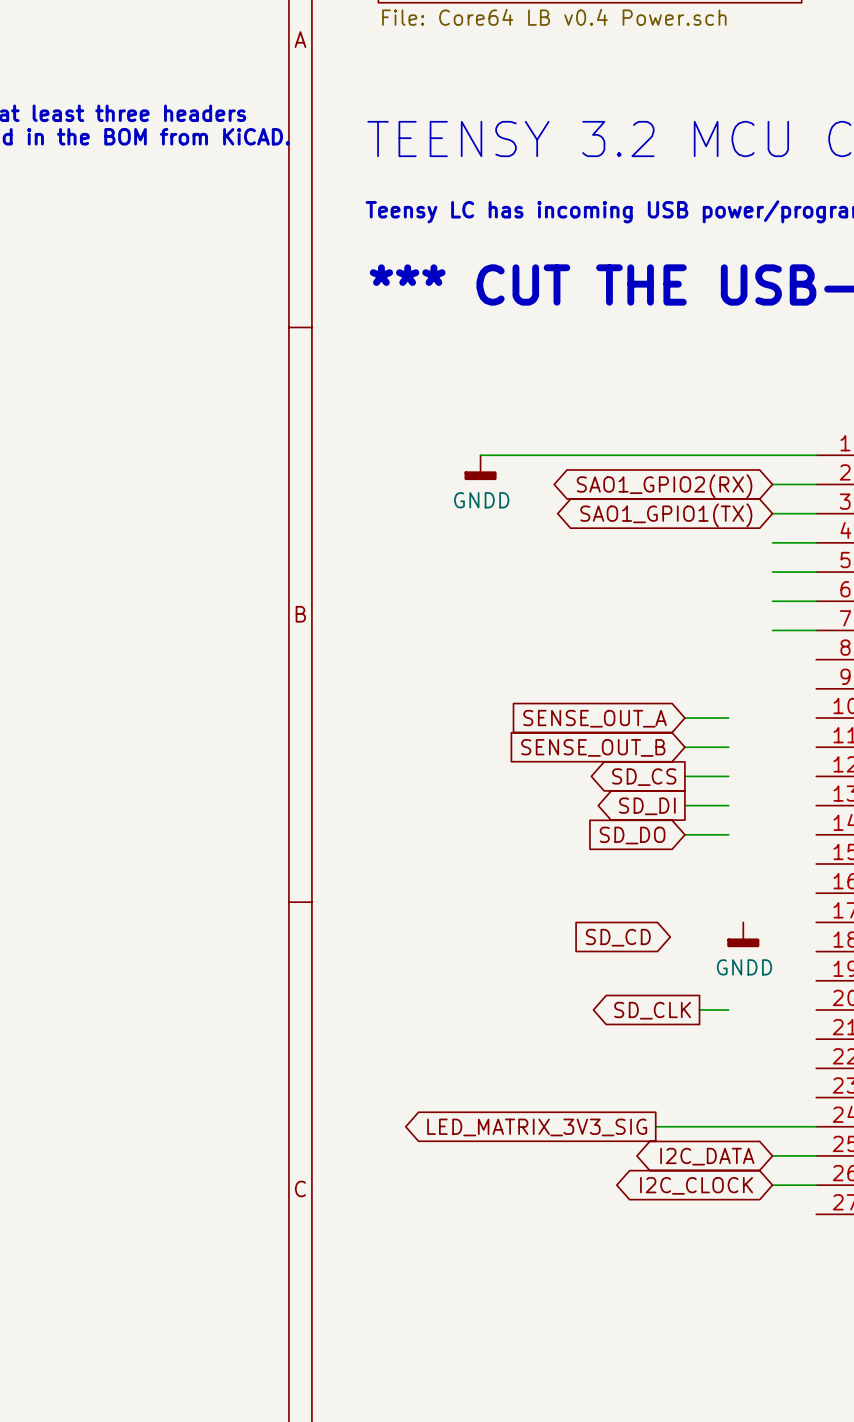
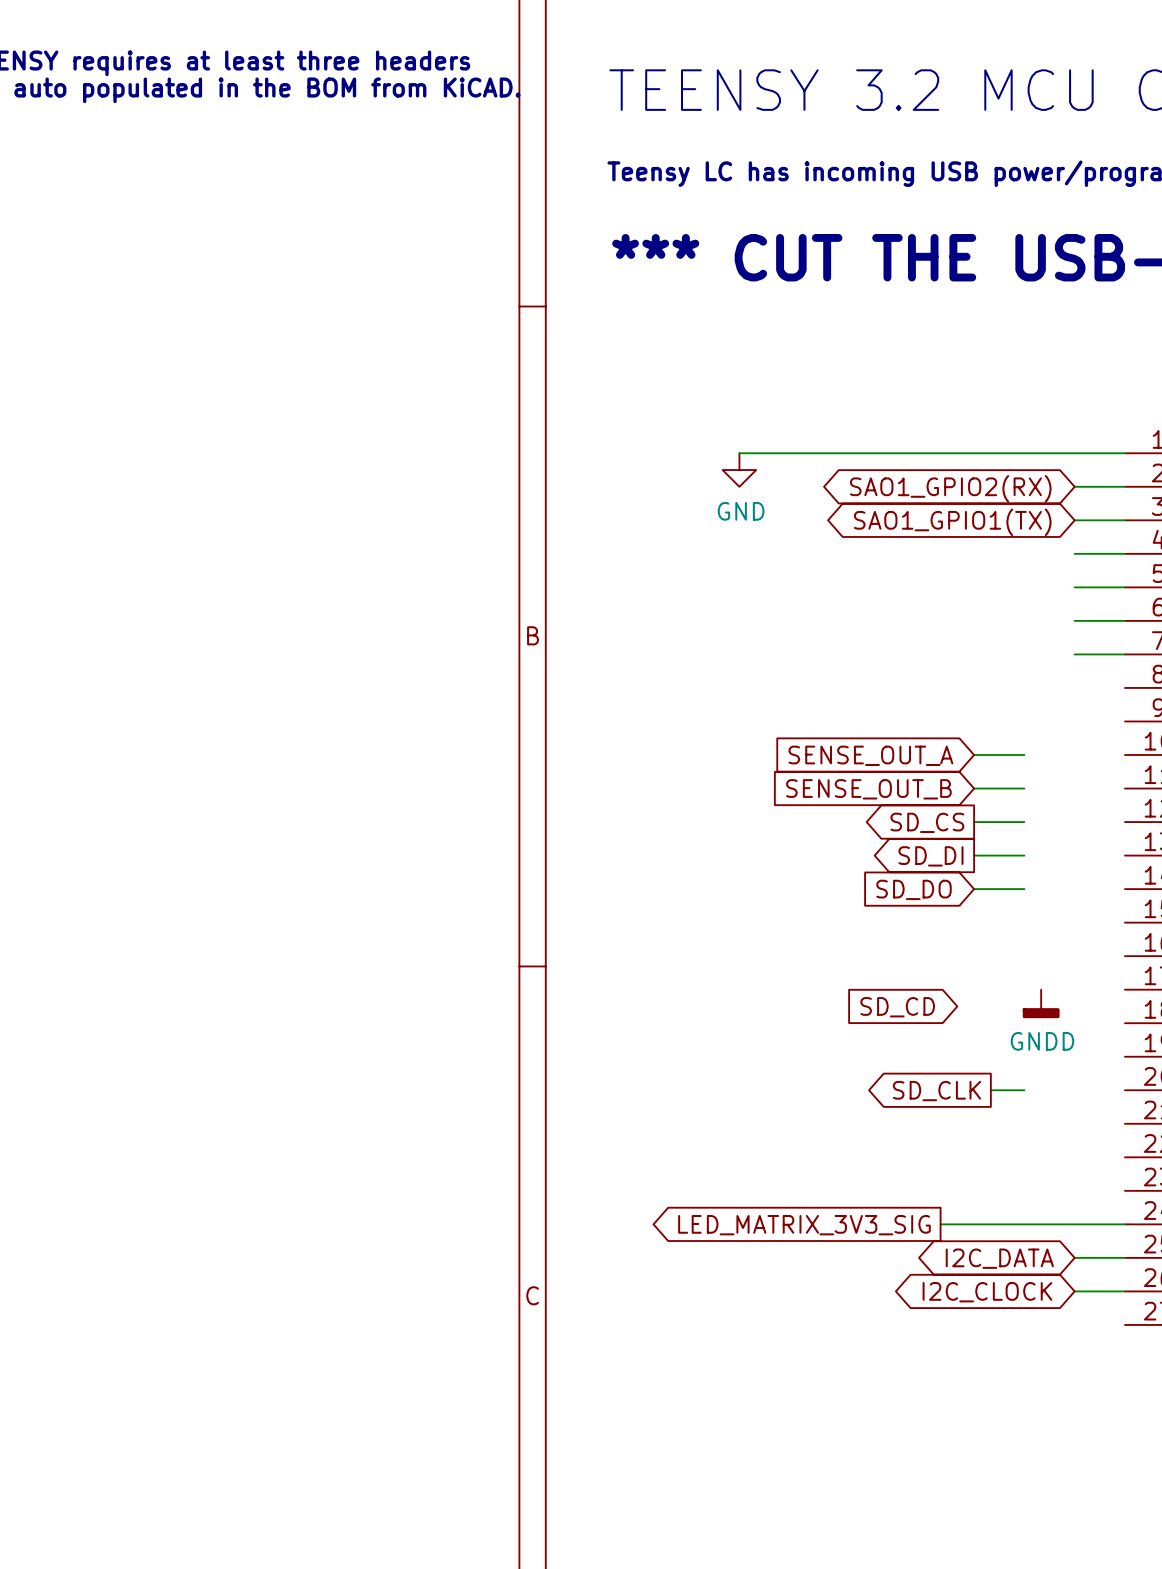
power symbol: GNDD (480, 467) -> GND (739, 470)

